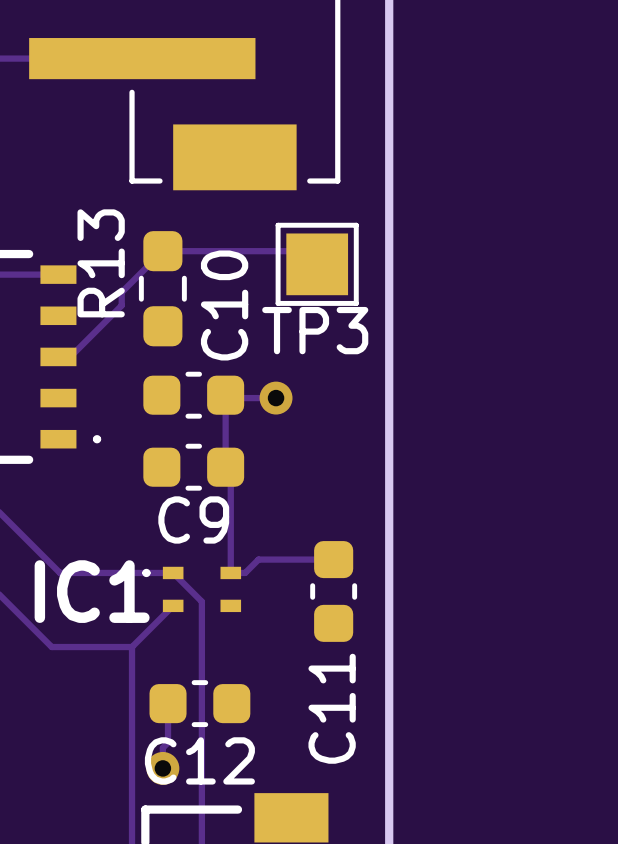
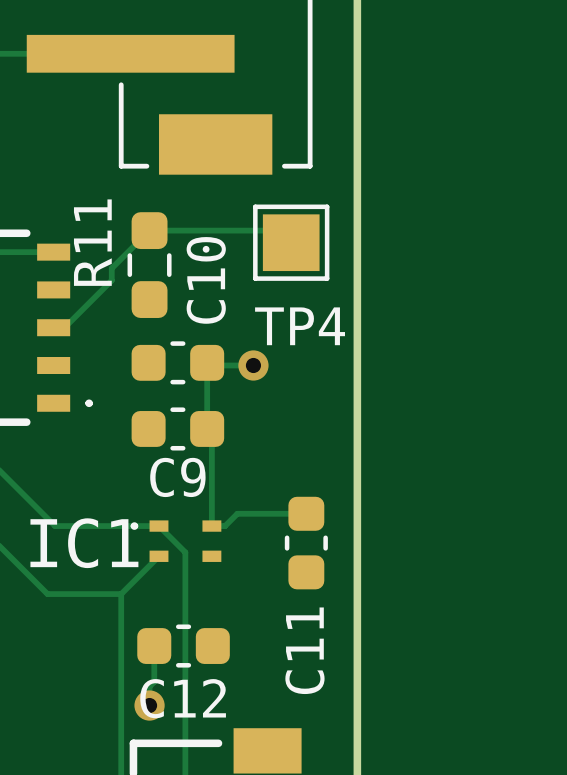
R13 name: R13 (101, 263) -> R11 (92, 242)
TP3 name: TP3 (315, 330) -> TP4 (300, 326)

